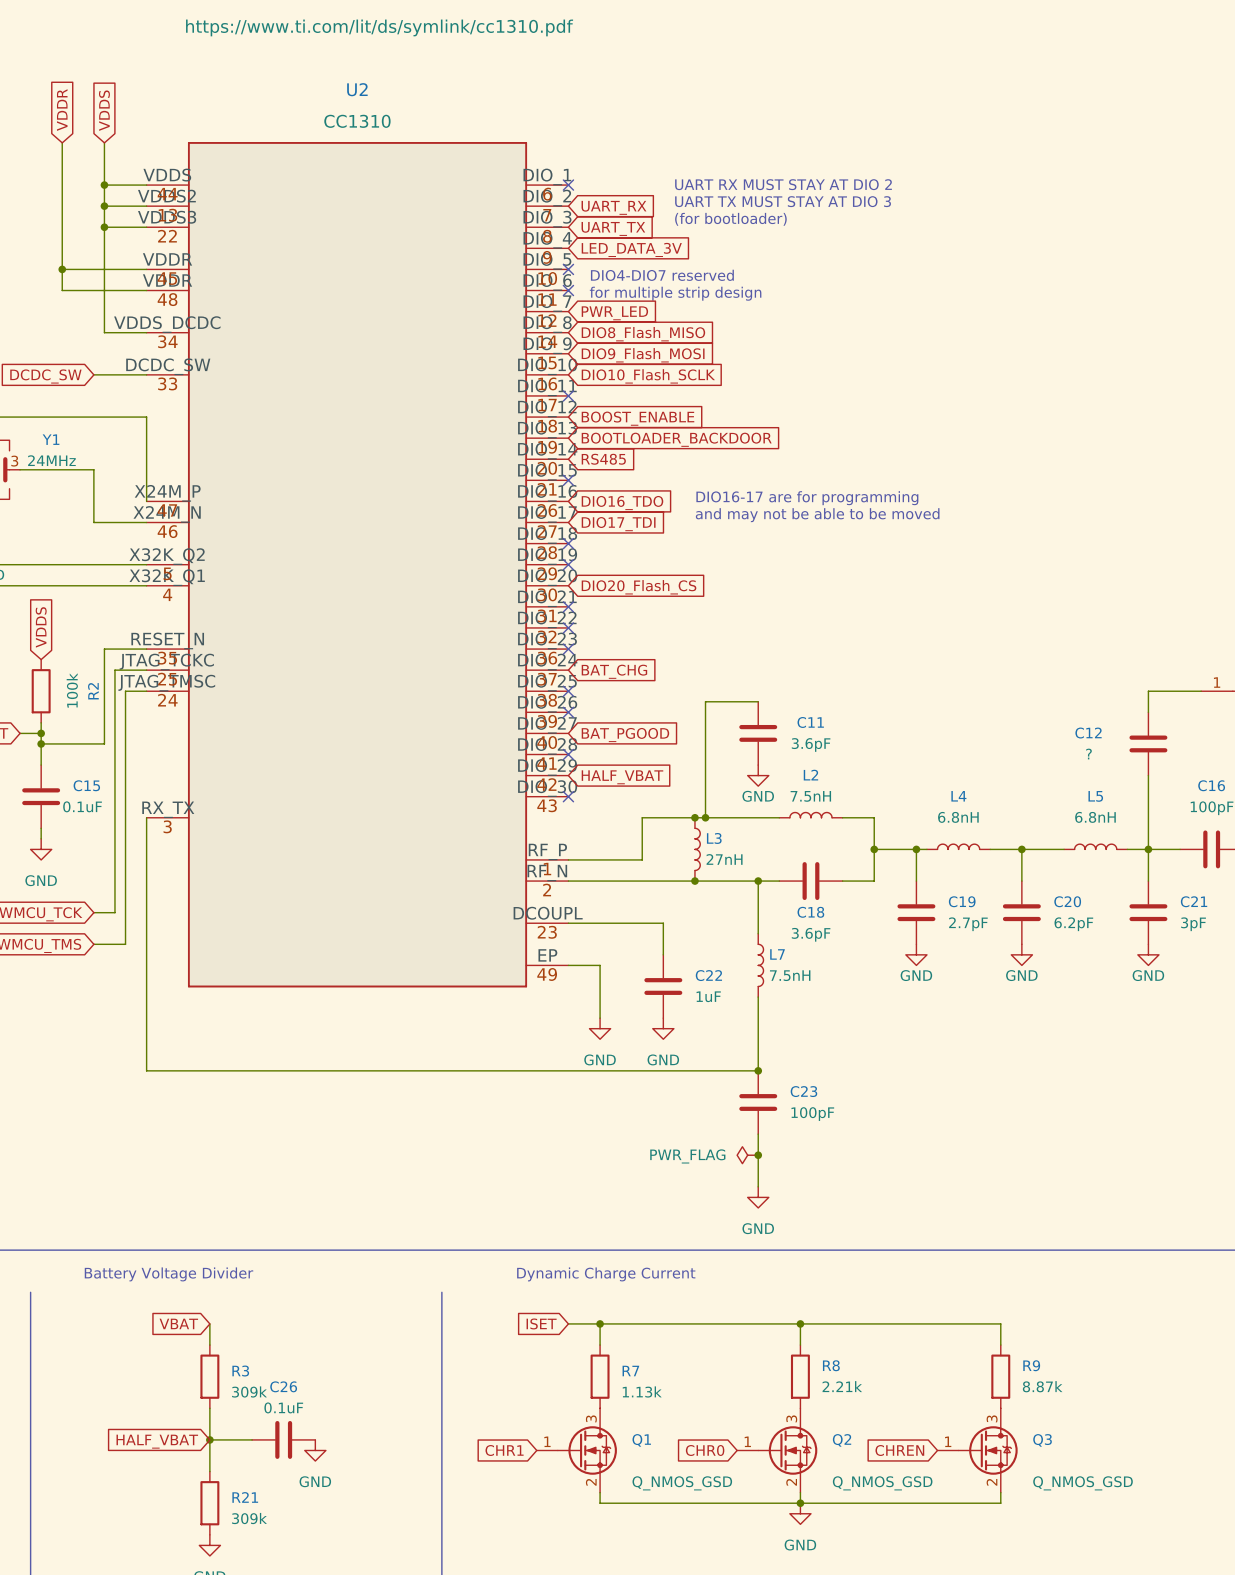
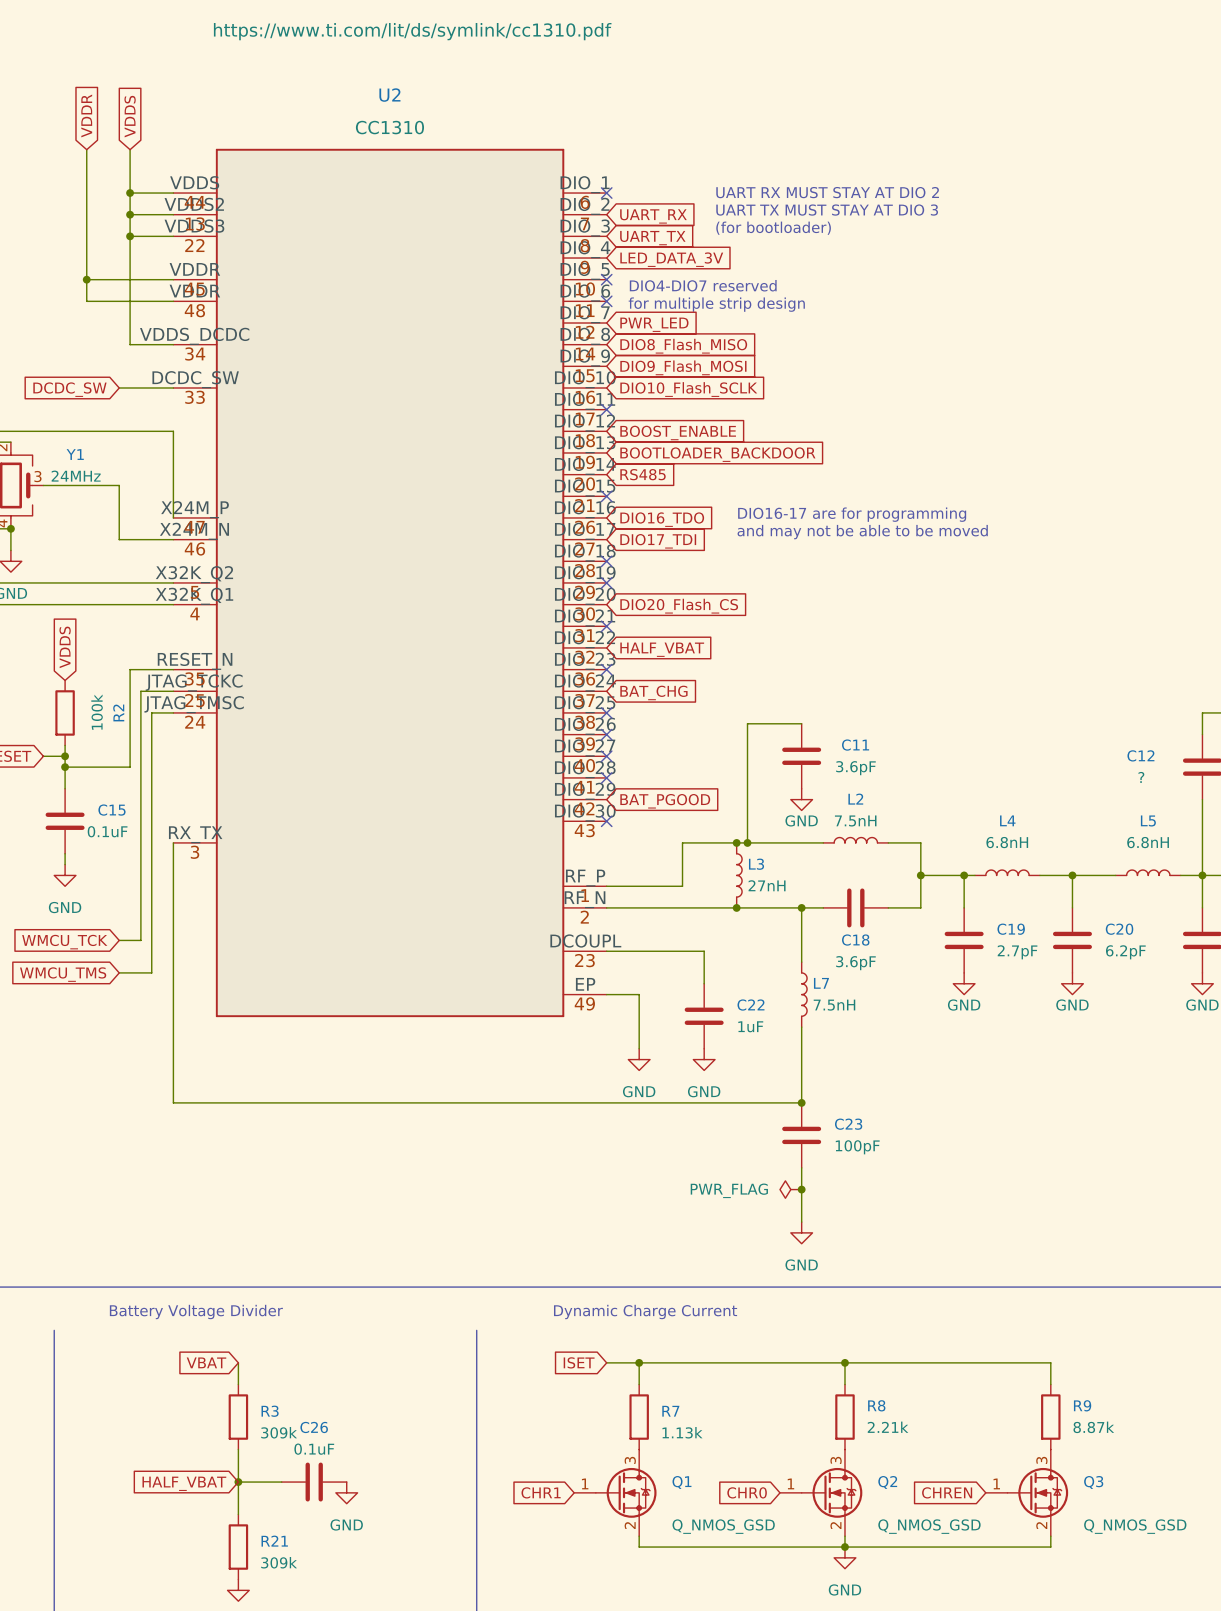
no-connect mark: (568, 627) -> none
global label: none -> HALF_VBAT (662, 649)
no-connect mark: none -> (606, 756)
global label: BAT_PGOOD (625, 735) -> none
global label: HALF_VBAT (622, 777) -> BAT_PGOOD (665, 801)

